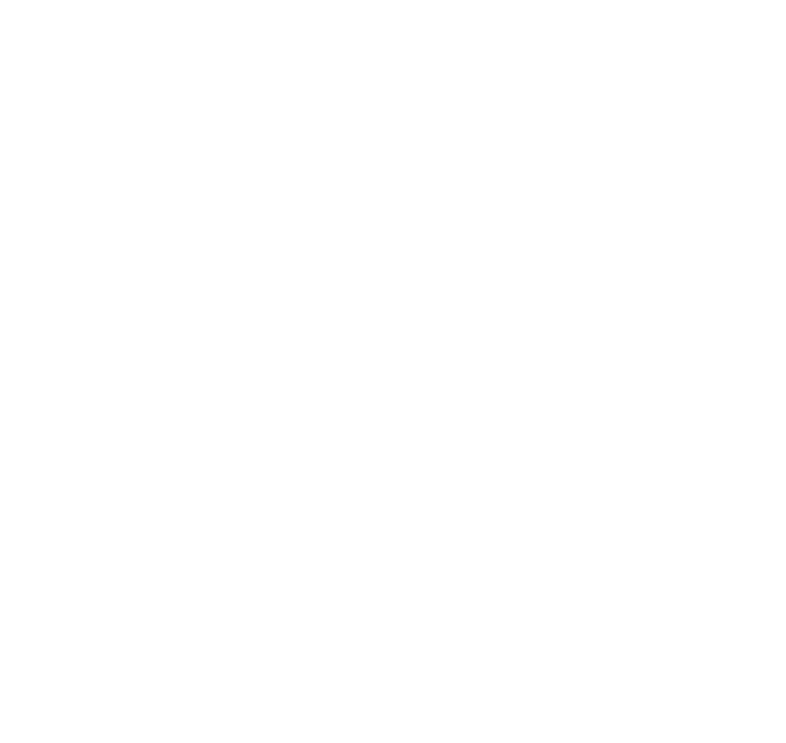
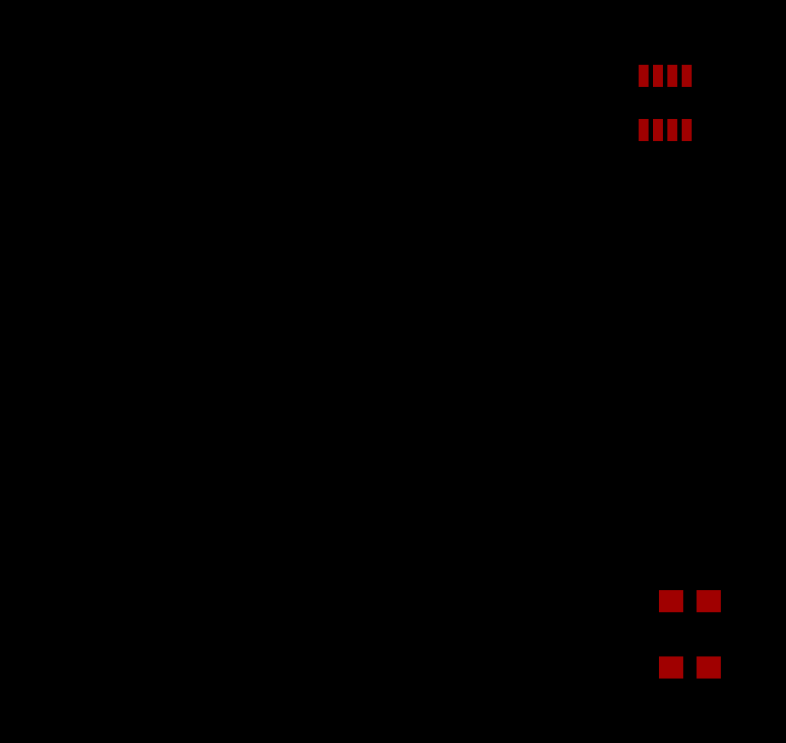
part: none -> (665, 102)
part: none -> (689, 601)
part: none -> (689, 667)

